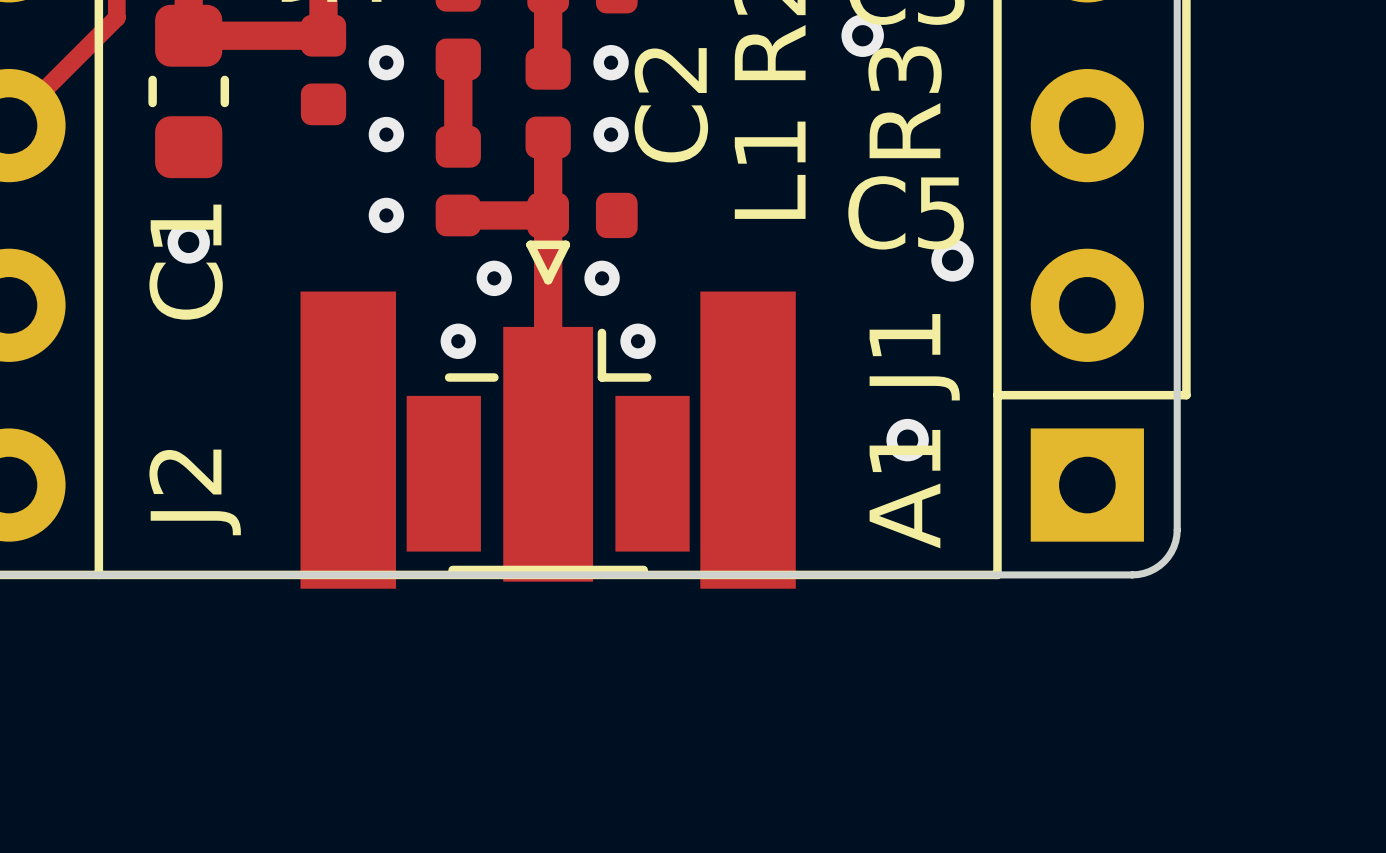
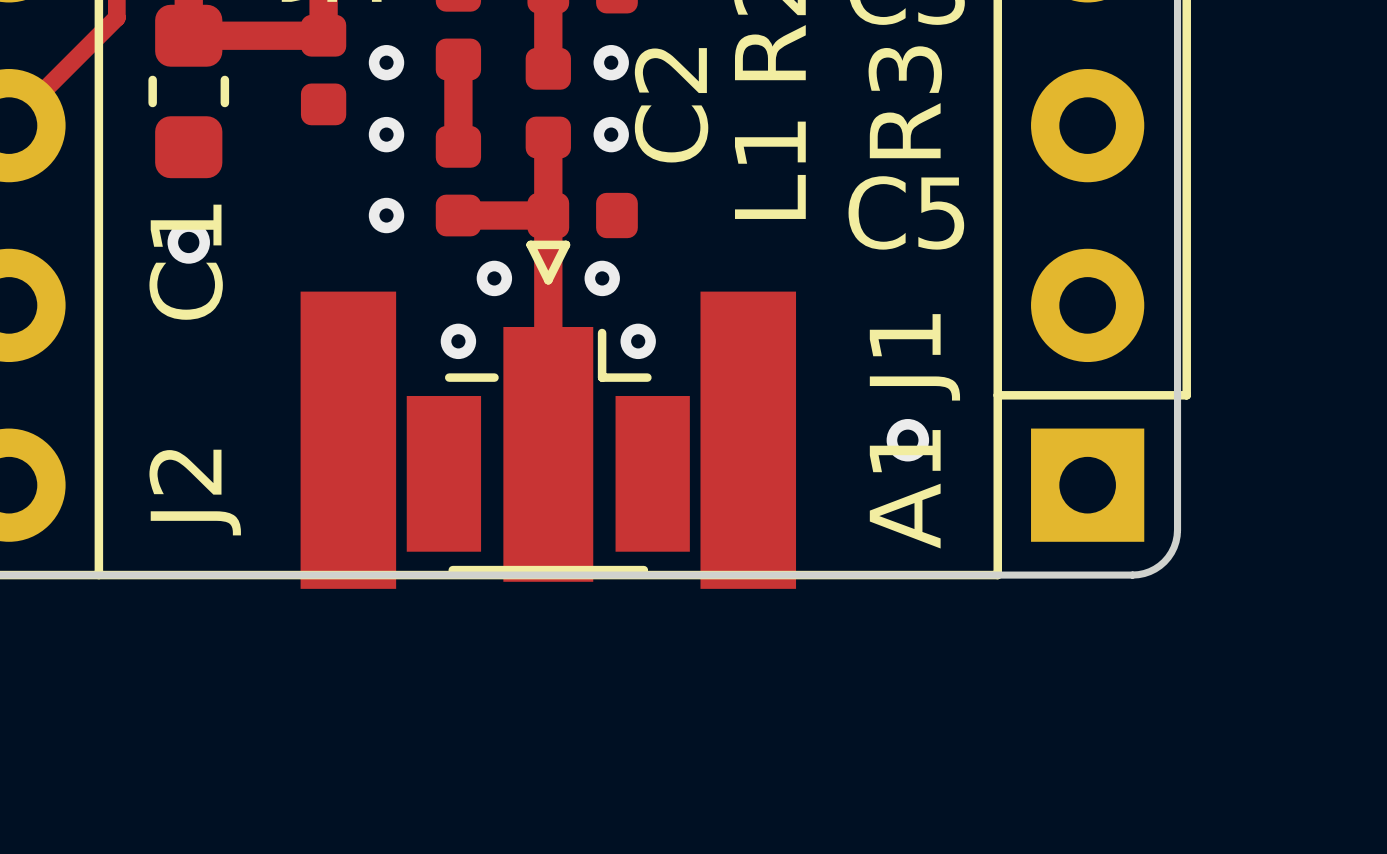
via: (862, 35) -> none
via: (952, 260) -> none

